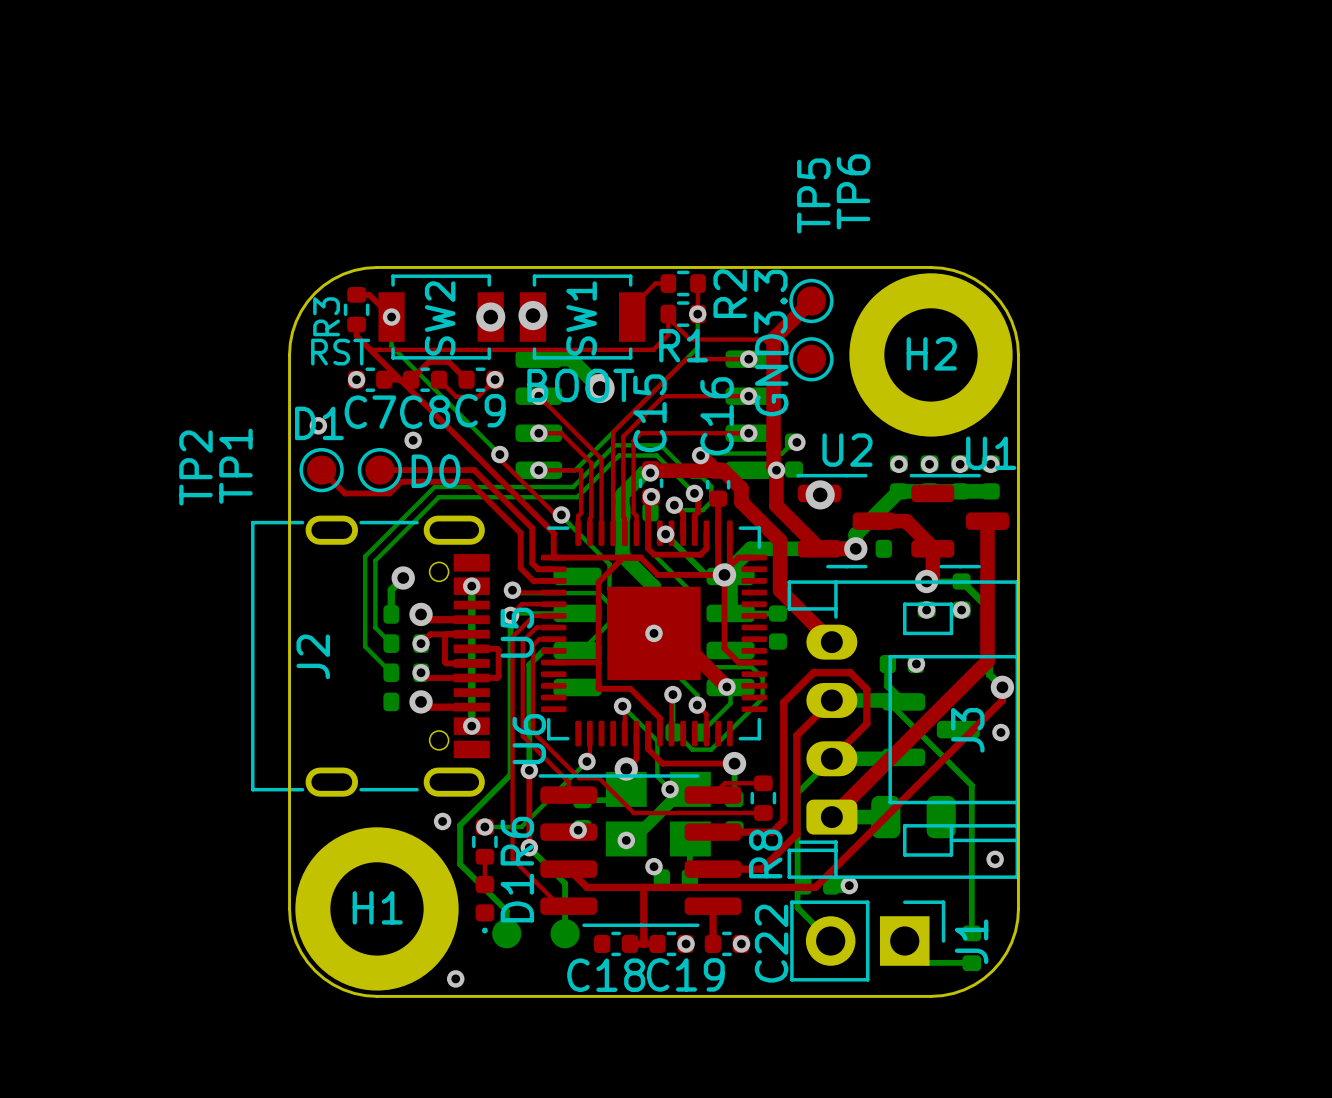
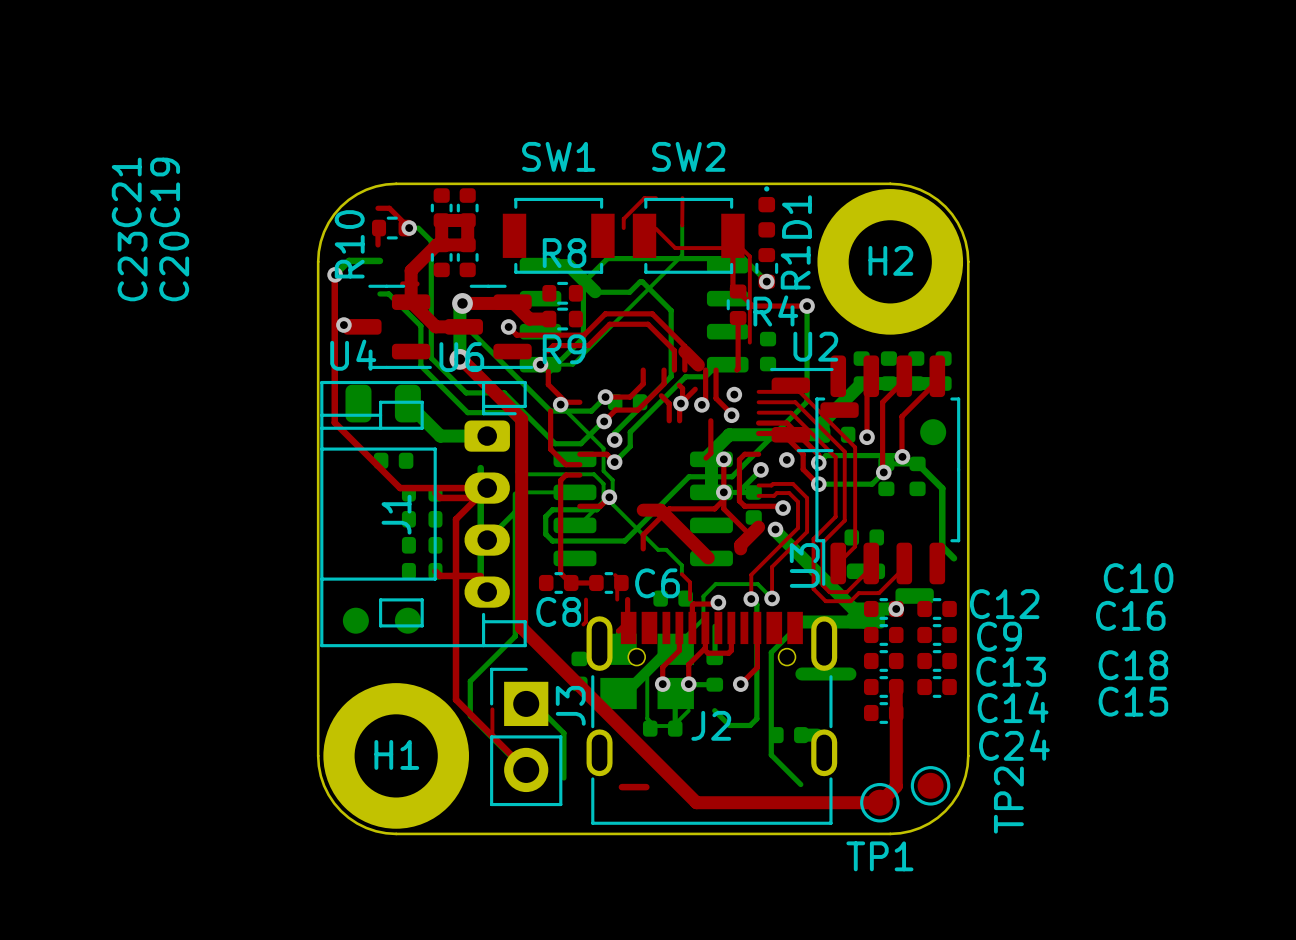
R2: (683, 283) -> none
C21: none -> (467, 208)
text: 3.3 (770, 301) -> none
top track: (811, 301) (773, 338) (773, 467) (776, 470) (776, 505) (819, 548) (855, 548) -> none
TP5: (811, 301) -> none
R3: (356, 309) -> none
top track: (668, 314) (668, 334) (653, 349) (370, 349) (356, 335) (553, 533) (553, 557) (640, 557) (657, 574) (724, 574) (718, 568) (718, 498) -> none
R1 rotation: 0° (683, 314) -> 90° clockwise (766, 268)
R1 position: (683, 314) -> (766, 268)
via: (697, 314) -> none
via: (532, 315) -> none
R10: none -> (392, 228)
bottom track: (391, 317) (391, 346) (499, 454) -> none
bottom track: none -> (418, 228) (431, 241) (431, 358) (466, 392) (504, 392) (555, 443) (580, 443) (604, 421)
SW2 position: (441, 317) -> (688, 235)
via: (490, 317) -> none
SW1 position: (582, 317) -> (558, 235)
SW2 name rotation: 0° (440, 318) -> 90° clockwise (688, 156)
SW1 name rotation: 0° (581, 318) -> 90° clockwise (558, 156)
top track: none -> (732, 235) (732, 286) (752, 306) (807, 306)
top track: none -> (441, 244) (441, 220) (467, 220) (467, 244) (436, 244) (411, 270) (411, 302) (435, 326) (463, 326)
C20: none -> (441, 257)
C23: none -> (467, 257)
text: RST (340, 352) -> none
bottom track: none -> (379, 260) (348, 260) (335, 274)
top track: (748, 359) (686, 359) (613, 432) (613, 533) -> none
via: (748, 359) -> none
TP6: (811, 359) -> none
top track: none -> (334, 275) (334, 422) (400, 488) (487, 488) (456, 519) (456, 699) (526, 769)
text: GND (771, 375) -> none
bottom track: none -> (766, 281) (743, 258) (607, 258) (583, 282) (583, 337) (548, 371)
via: none -> (766, 281)
via position: (356, 379) -> (335, 274)
C7: (370, 379) -> none
C8 position: (425, 379) -> (558, 582)
top track: (439, 379) (456, 396) (478, 396) (495, 379) -> none
top track: (466, 379) (448, 361) (428, 361) (411, 379) (401, 381) -> none
C9 position: (480, 379) -> (937, 608)
via: (495, 379) -> none
text: BOOT (580, 385) -> none
via: (600, 388) -> none
bottom track: none -> (600, 292) (629, 292) (639, 282) (642, 282) (671, 310) (671, 376) (614, 433) (614, 439)
bottom track: none -> (379, 293) (388, 293) (420, 326) (420, 365) (467, 412) (509, 412) (518, 421) (518, 508) (487, 540)
top track: (538, 396) (601, 458) (601, 533) -> none
via: (538, 396) -> none
top track: (748, 396) (663, 396) (623, 436) (624, 533) -> none
via: (748, 396) -> none
top track: none -> (462, 303) (512, 302) (529, 319) (549, 319)
via: none -> (462, 303)
R4: none -> (738, 304)
bottom track: none -> (807, 306) (807, 401) (732, 476) (689, 476) (624, 540) (552, 540) (545, 534) (545, 516) (552, 509) (596, 509) (609, 497)
via: none -> (807, 306)
C9 name position: C9 (480, 410) -> C9 (999, 636)
C15 name position: C15 (649, 413) -> C15 (1133, 701)
C16 name position: C16 (717, 416) -> C16 (1130, 615)
top track: none -> (738, 318) (736, 370)
R9: none -> (562, 319)
text: D1 (319, 423) -> none
U4: none -> (387, 326)
top track: none -> (508, 326) (516, 335) (584, 335) (605, 313) (652, 313) (684, 346) (684, 370)
via: none -> (508, 326)
top track: (538, 433) (561, 433) (591, 463) (589, 533) -> none
via: (538, 433) -> none
top track: (748, 433) (641, 433) (633, 440) (633, 512) (636, 515) (636, 533) -> none
via: (748, 433) -> none
via: (413, 440) -> none
bottom track: (793, 441) (782, 453) (702, 453) (700, 455) -> none
via: (796, 442) -> none
top track: (499, 454) (499, 459) (555, 514) (561, 514) -> none
via: (499, 454) -> none
top track: none -> (548, 350) (553, 345) (588, 345) (609, 324) (648, 324) (674, 350) (674, 370)
via: (700, 455) -> none
top track: none -> (459, 359) (521, 419) (521, 627) (696, 802) (879, 802) (896, 786) (896, 687)
bottom track: none -> (459, 359) (459, 306) (462, 303) (462, 322) (550, 411) (591, 411) (605, 397)
via: none -> (459, 359)
via: (898, 464) -> none
via: (929, 464) -> none
via: (960, 464) -> none
via: (990, 464) -> none
bottom track: none -> (723, 360) (712, 360) (712, 370) (705, 376) (685, 376) (630, 432) (630, 446) (614, 462)
TP1 name rotation: 0° (235, 466) -> 90° clockwise (879, 856)
TP1 name position: TP1 (235, 466) -> TP1 (879, 856)
TP2 name position: TP2 (196, 468) -> TP2 (1008, 800)
top track: (321, 470) (344, 493) (389, 493) (401, 481) (469, 481) (520, 532) (520, 568) (533, 580) (553, 580) -> none
TP2 position: (321, 470) -> (930, 785)
top track: (379, 470) (474, 470) (532, 528) (532, 563) (538, 569) (553, 569) -> none
TP1 position: (379, 470) -> (879, 802)
top track: (538, 470) (581, 470) (581, 512) (578, 515) (578, 533) -> none
via: (776, 470) -> none
text: D0 (436, 471) -> none
top track: (650, 472) (652, 470) (723, 470) (741, 488) (741, 502) (780, 540) (780, 590) (831, 642) -> none
bottom track: (650, 472) (644, 472) (622, 494) (622, 555) (654, 587) (654, 633) -> none
via: (650, 472) -> none
top track: none -> (643, 370) (643, 383) (630, 397) (605, 397)
top track: none -> (664, 370) (664, 383) (637, 410) (615, 410) (604, 421)
top track: none -> (705, 370) (705, 401) (701, 404)
top track: none -> (716, 370) (716, 398) (731, 413)
top track: none -> (548, 371) (548, 384) (565, 402) (579, 402)
C15 rotation: 0° (651, 483) -> 90° clockwise (883, 687)
C15 position: (651, 483) -> (883, 687)
top track: none -> (871, 376) (867, 380) (867, 437)
top track: none -> (904, 376) (904, 380) (882, 402) (883, 472)
top track: none -> (937, 376) (937, 381) (901, 416) (902, 456)
C16 rotation: 0° (718, 484) -> 90° clockwise (883, 635)
C16 position: (718, 484) -> (883, 635)
bottom track: (694, 493) (656, 455) (619, 455) (577, 497) (438, 497) (375, 560) (375, 627) (391, 643) -> none
via: (694, 493) -> none
via: (820, 494) -> none
bottom track: (651, 496) (648, 499) (648, 549) (697, 598) (697, 659) (705, 667) (751, 667) (762, 677) (762, 698) (711, 749) (692, 749) (672, 730) -> none
via: (651, 496) -> none
top track: (651, 497) (648, 500) (648, 548) (654, 554) (700, 554) (706, 548) (706, 533) -> none
top track: none -> (758, 391) (799, 391) (855, 447) (855, 546) (838, 563)
via: none -> (734, 394)
bottom track: (674, 505) (679, 510) (702, 510) (711, 501) (711, 486) (701, 476) (692, 476) (660, 445) (614, 445) (573, 487) (434, 487) (365, 556) (365, 646) (391, 672) -> none
via: (674, 505) -> none
via: none -> (605, 397)
top track: none -> (758, 402) (795, 402) (844, 451) (844, 520) (822, 542) (822, 585) (829, 592) (847, 592) (871, 567) (871, 563)
bottom track: none -> (407, 403) (440, 436) (487, 436)
via: none -> (680, 403)
via: none -> (701, 404)
top track: (874, 521) (906, 521) (932, 547) (932, 575) (926, 581) -> none
U1: (959, 521) -> none
top track: (987, 521) (987, 661) (831, 817) -> none
top track: none -> (550, 411) (550, 449) (565, 464) (579, 464)
top track: none -> (758, 412) (791, 412) (835, 457) (835, 516) (813, 538) (813, 589) (825, 601) (850, 601) (858, 593) (878, 593) (904, 567) (904, 563)
via: none -> (731, 415)
via: none -> (604, 421)
bottom track: (665, 534) (706, 574) (724, 574) -> none
via: (665, 534) -> none
top track: none -> (758, 423) (786, 423) (818, 455) (818, 462)
part: none -> (933, 432)
top track: none -> (758, 433) (782, 433) (803, 454) (803, 469) (818, 484)
via: (855, 548) -> none
via: none -> (867, 437)
via: none -> (614, 439)
top track: (623, 557) (598, 582) (598, 688) (630, 688) (659, 718) (659, 733) -> none
top track: (754, 557) (738, 557) (724, 571) (724, 648) (738, 662) (754, 662) -> none
top track: none -> (579, 454) (606, 454) (614, 462)
top track: none -> (758, 454) (744, 454) (739, 459) (739, 500) (744, 506) (781, 506) (783, 508)
bottom track: none -> (902, 456) (826, 455) (818, 462)
via position: (724, 574) -> (723, 459)
top track: none -> (723, 459) (723, 508) (750, 535)
via: none -> (786, 459)
part: none -> (393, 460)
bottom track: (403, 578) (391, 589) (391, 614) -> none
via: (403, 578) -> none
via: none -> (614, 462)
J3 footprint: [787, 580, 1020, 879] -> [490, 667, 563, 807]
via: none -> (818, 462)
via position: (926, 581) -> (902, 456)
via: (471, 586) -> none
bottom track: none -> (760, 469) (738, 492)
via: none -> (760, 469)
U3: none -> (887, 470)
top track: (512, 590) (514, 592) (553, 592) -> none
via: (512, 590) -> none
bottom track: none -> (883, 472) (872, 484) (818, 484)
top track: none -> (579, 475) (565, 475) (560, 480) (560, 573) (570, 582) (596, 582)
top track: (553, 604) (521, 604) (510, 615) -> none
via: none -> (818, 484)
top track: none -> (758, 485) (793, 483) (807, 498) (807, 531) (772, 566) (772, 598)
via position: (926, 610) -> (883, 472)
via: (961, 610) -> none
via: none -> (723, 492)
via: (421, 614) -> none
via: (510, 615) -> none
top track: (553, 615) (533, 615) (512, 637) (512, 858) (559, 906) (568, 906) -> none
top track: none -> (758, 495) (789, 493) (798, 501) (798, 528) (751, 574) (751, 599)
top track: none -> (609, 497) (600, 506) (579, 506)
via: none -> (609, 497)
top track: none -> (723, 499) (714, 508) (669, 508) (643, 535) (643, 548)
top track: (553, 627) (536, 627) (522, 641) (522, 736) (568, 782) (568, 795) -> none
via: none -> (783, 508)
U5: (654, 633) -> none
via: (654, 633) -> none
top track: (446, 634) (444, 661) (471, 663) -> none
top track: (471, 634) (430, 634) (421, 643) -> none
top track: (553, 639) (539, 639) (532, 645) (532, 731) (579, 778) (599, 778) (633, 813) (763, 813) -> none
via: (421, 643) -> none
top track: (471, 648) (498, 650) (497, 678) (426, 678) (421, 672) -> none
bottom track: (577, 650) (543, 650) (529, 664) (529, 770) -> none
top track: none -> (758, 527) (740, 544) (740, 548)
bottom track: none -> (775, 529) (853, 608) (896, 608)
via: none -> (775, 529)
J2 rotation: 0° (370, 656) -> 90° counterclockwise (711, 718)
J2 position: (370, 656) -> (711, 718)
top track: (553, 662) (598, 662) -> none
bottom track: (887, 664) (887, 686) (903, 701) (902, 700) (831, 700) (886, 700) (971, 785) (971, 933) -> none
via: (916, 664) -> none
via: (421, 672) -> none
via: (726, 686) -> none
bottom track: (730, 687) (730, 703) (701, 732) -> none
top track: (1002, 687) (1002, 700) (815, 887) (586, 887) (568, 869) -> none
via: (1002, 687) -> none
top track: (672, 694) (671, 733) -> none
via: (672, 694) -> none
top track: (831, 700) (796, 735) (796, 834) (761, 869) (713, 869) -> none
via: (421, 701) -> none
via: (697, 705) -> none
bottom track: (622, 706) (657, 741) (657, 776) (670, 789) -> none
via: (622, 706) -> none
C6: none -> (608, 582)
via: (471, 726) -> none
bottom track: none -> (772, 598) (757, 584) (715, 584) (703, 596) (703, 619) (647, 675) (647, 718) (654, 726) (673, 726) (688, 710)
via: none -> (772, 598)
via: (1000, 732) -> none
top track: (648, 733) (648, 749) (662, 763) (734, 763) -> none
bottom track: none -> (751, 599) (756, 604) (756, 718) (750, 725) (729, 725) (714, 710)
via: none -> (751, 599)
top track: none -> (718, 602) (693, 604) (692, 627)
via: none -> (718, 602)
U6 name position: U6 (529, 739) -> U6 (461, 357)
C10: none -> (883, 608)
via: none -> (896, 608)
part: none -> (355, 620)
part: none -> (407, 620)
top track: (831, 758) (866, 723) (866, 689) (850, 672) (813, 672) (783, 702) (783, 820) (772, 832) (713, 832) -> none
bottom track: (586, 761) (521, 827) (484, 827) -> none
via: (586, 761) -> none
via: (734, 763) -> none
top track: none -> (679, 627) (679, 650) (662, 667) (662, 684)
top track: none -> (705, 627) (705, 650) (707, 653) (728, 653) (731, 650) (731, 627)
top track: none -> (757, 627) (757, 667) (740, 684)
via: (626, 768) -> none
top track: (529, 770) (529, 847) -> none
via: (529, 770) -> none
C12: none -> (937, 635)
U6 footprint: [538, 774, 742, 928] -> [444, 284, 534, 369]
top track: (763, 783) (724, 783) (713, 795) -> none
top track: none -> (705, 648) (688, 664) (688, 684)
via: (670, 789) -> none
R8 rotation: 0° (763, 798) -> 90° clockwise (562, 293)
R8 position: (763, 798) -> (562, 293)
C13: none -> (937, 661)
part position: (913, 817) -> (383, 403)
via: (442, 821) -> none
via: (484, 827) -> none
via: none -> (662, 684)
via: none -> (688, 684)
via: none -> (740, 684)
via: (578, 830) -> none
C14: none -> (937, 687)
via: (626, 840) -> none
R6: (484, 841) -> none
via: (529, 847) -> none
R8 name position: R8 (765, 854) -> R8 (564, 253)
via: (995, 859) -> none
C24: none -> (883, 713)
via: (654, 866) -> none
via: (849, 885) -> none
top track: (643, 887) (643, 943) -> none
J1 footprint: [790, 900, 946, 982] -> [320, 380, 527, 648]
D1 rotation: 0° (484, 904) -> 180° (766, 211)
D1 position: (484, 904) -> (766, 211)
top track: (713, 906) (713, 943) -> none
part: (506, 933) -> none
part: (565, 933) -> none
bottom track: (904, 941) (926, 962) (971, 962) -> none
J1 name position: J1 (971, 941) -> J1 (396, 514)
C18 position: (616, 943) -> (883, 661)
C19 rotation: 0° (671, 943) -> 90° clockwise (441, 208)
C19 position: (671, 943) -> (441, 208)
via: (686, 943) -> none
C22: (726, 943) -> none
via: (741, 943) -> none
part: (971, 948) -> none
C19 name position: C19 (685, 974) -> C19 (165, 192)
C18 name position: C18 (606, 975) -> C18 (1133, 665)
via: (455, 978) -> none

